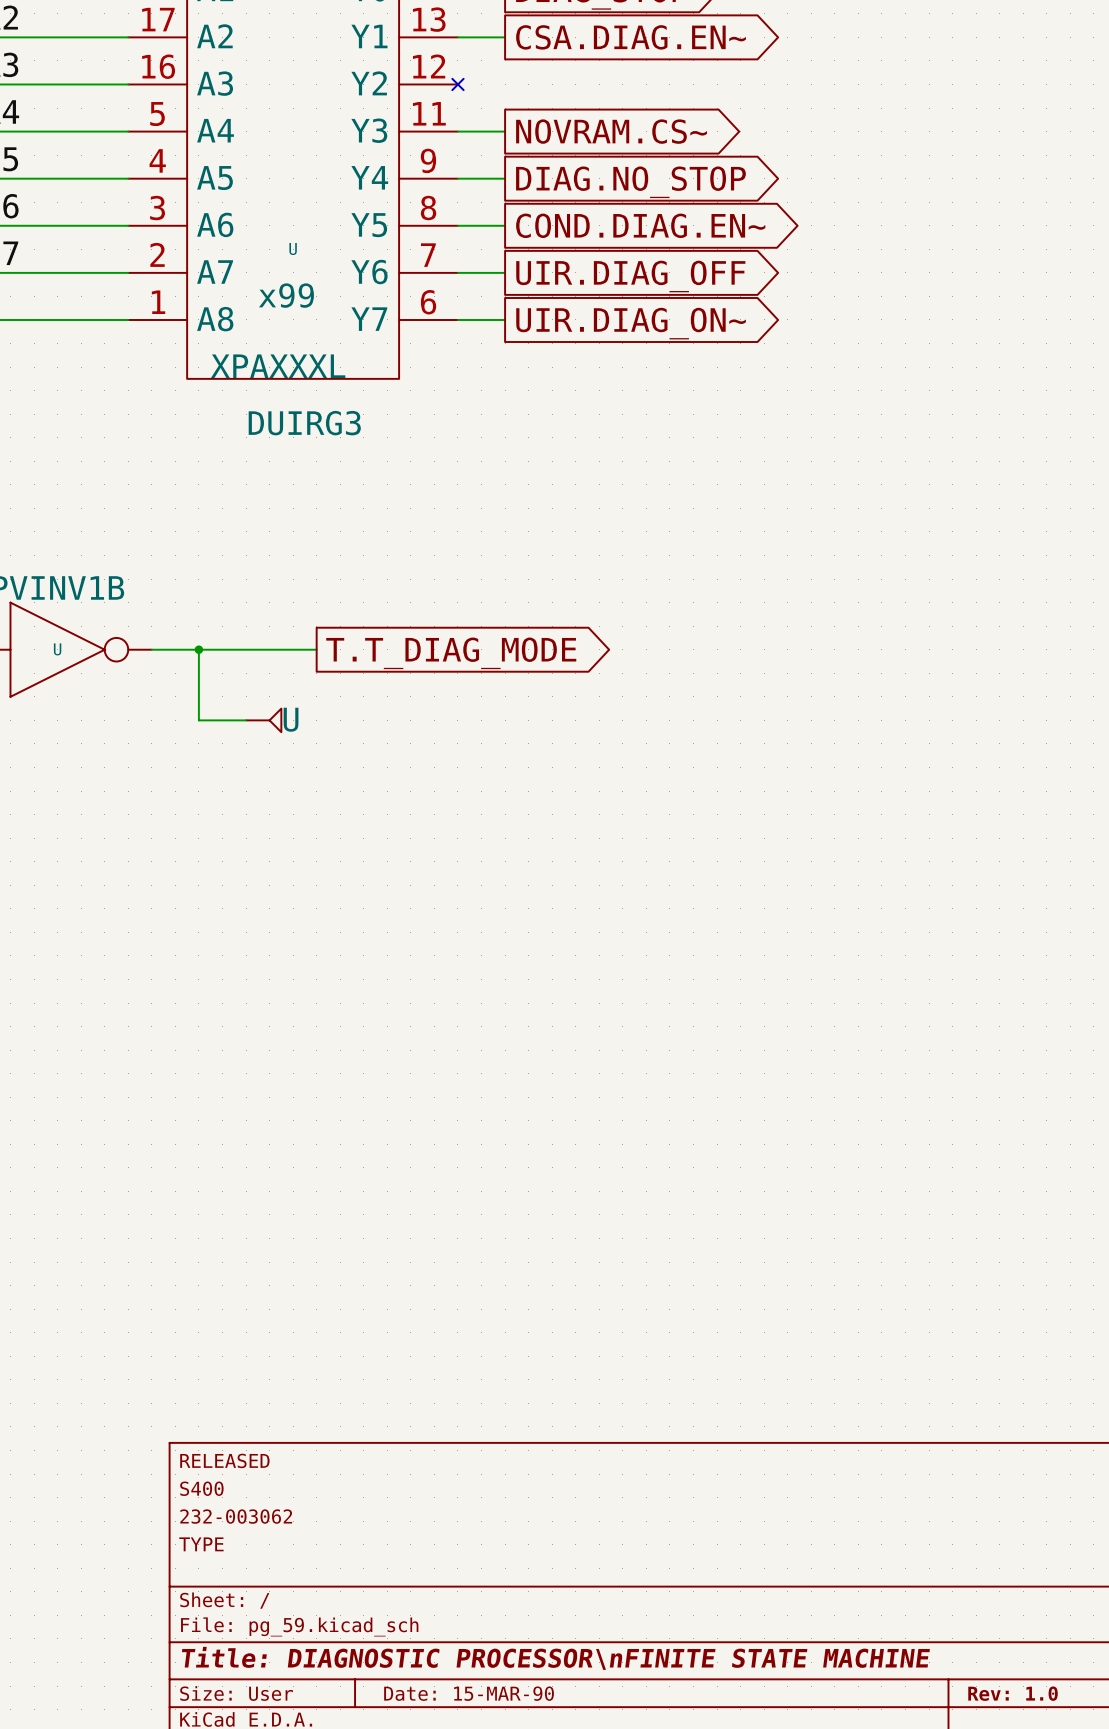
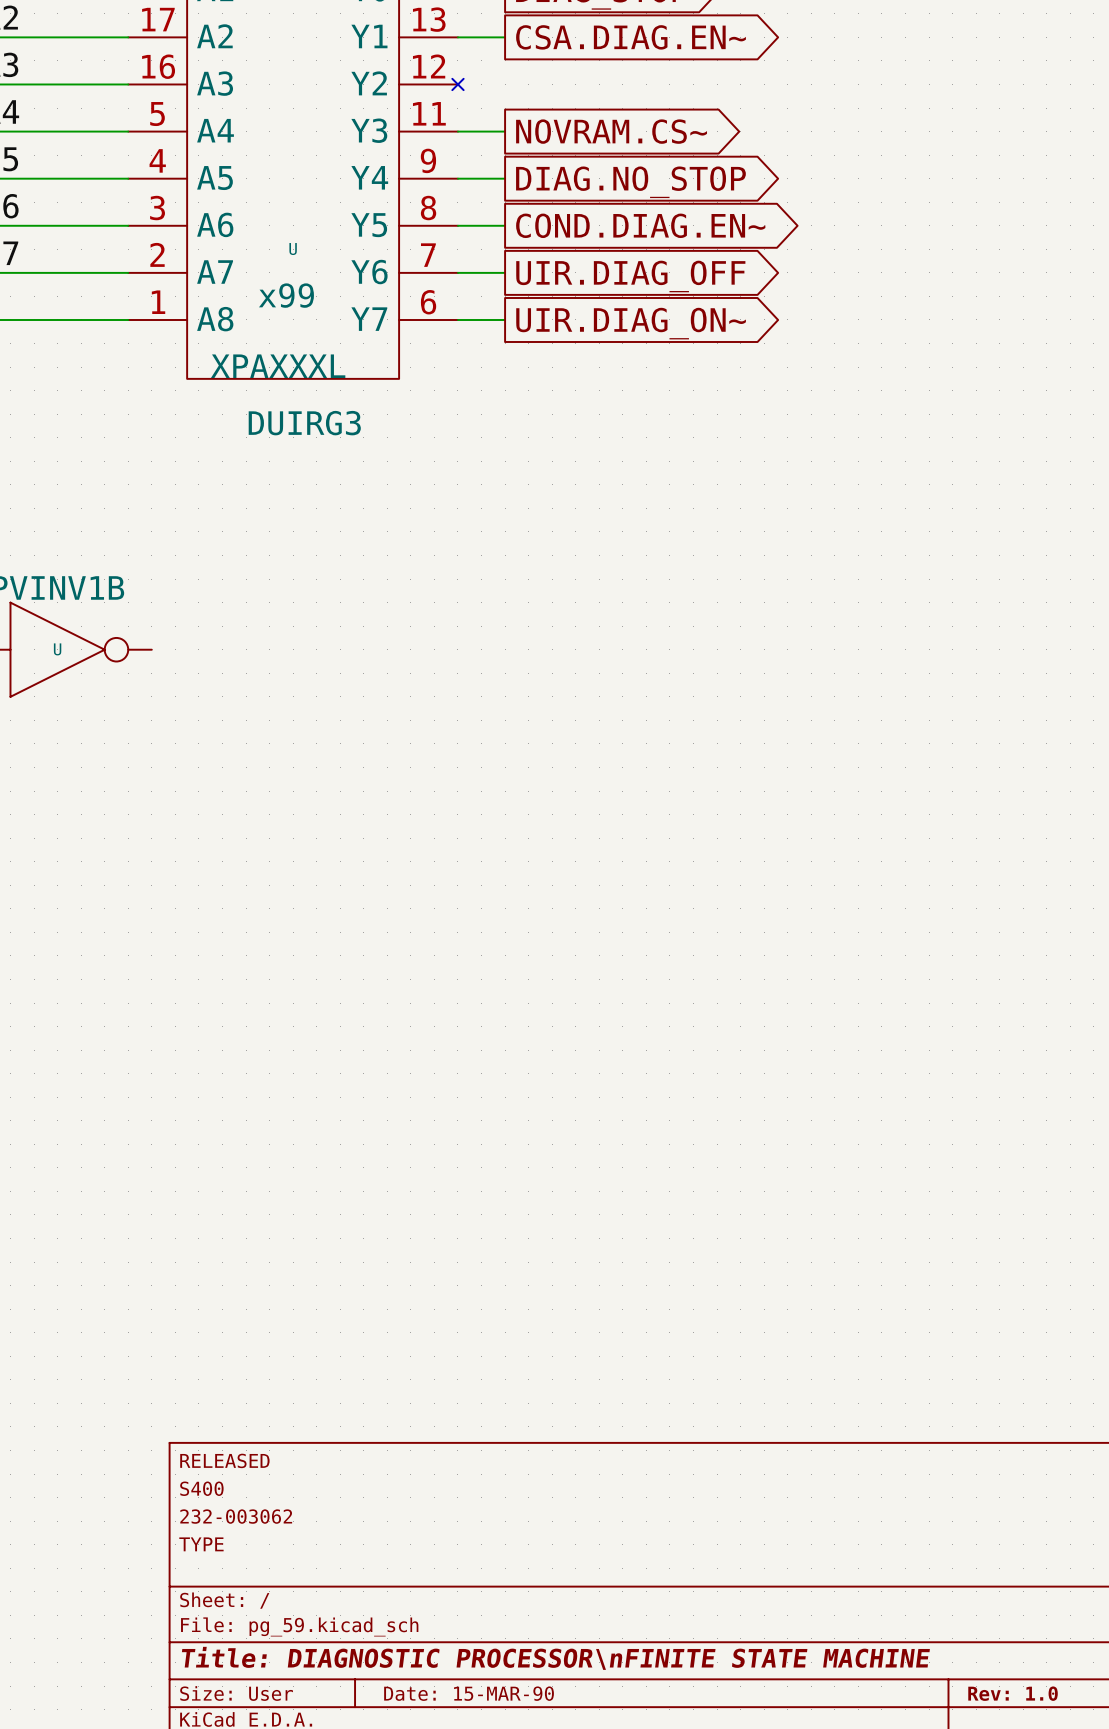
wire: (151, 649) (316, 649) -> none
wire: (198, 649) (198, 720) (246, 720) -> none
junction: (198, 649) -> none
global label: T.T_DIAG_MODE (451, 653) -> none
U: (264, 720) -> none

